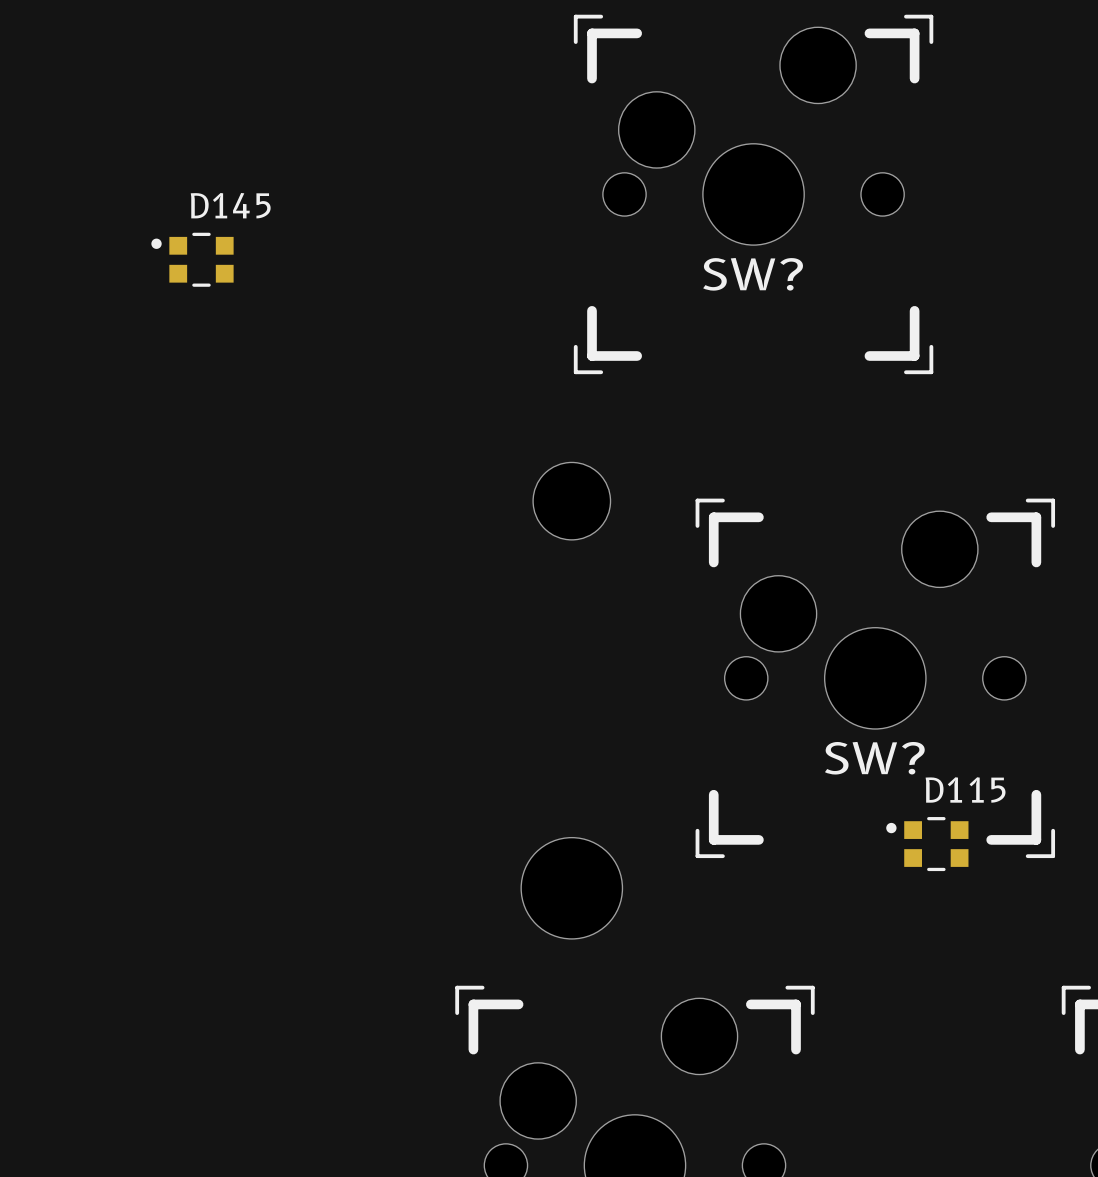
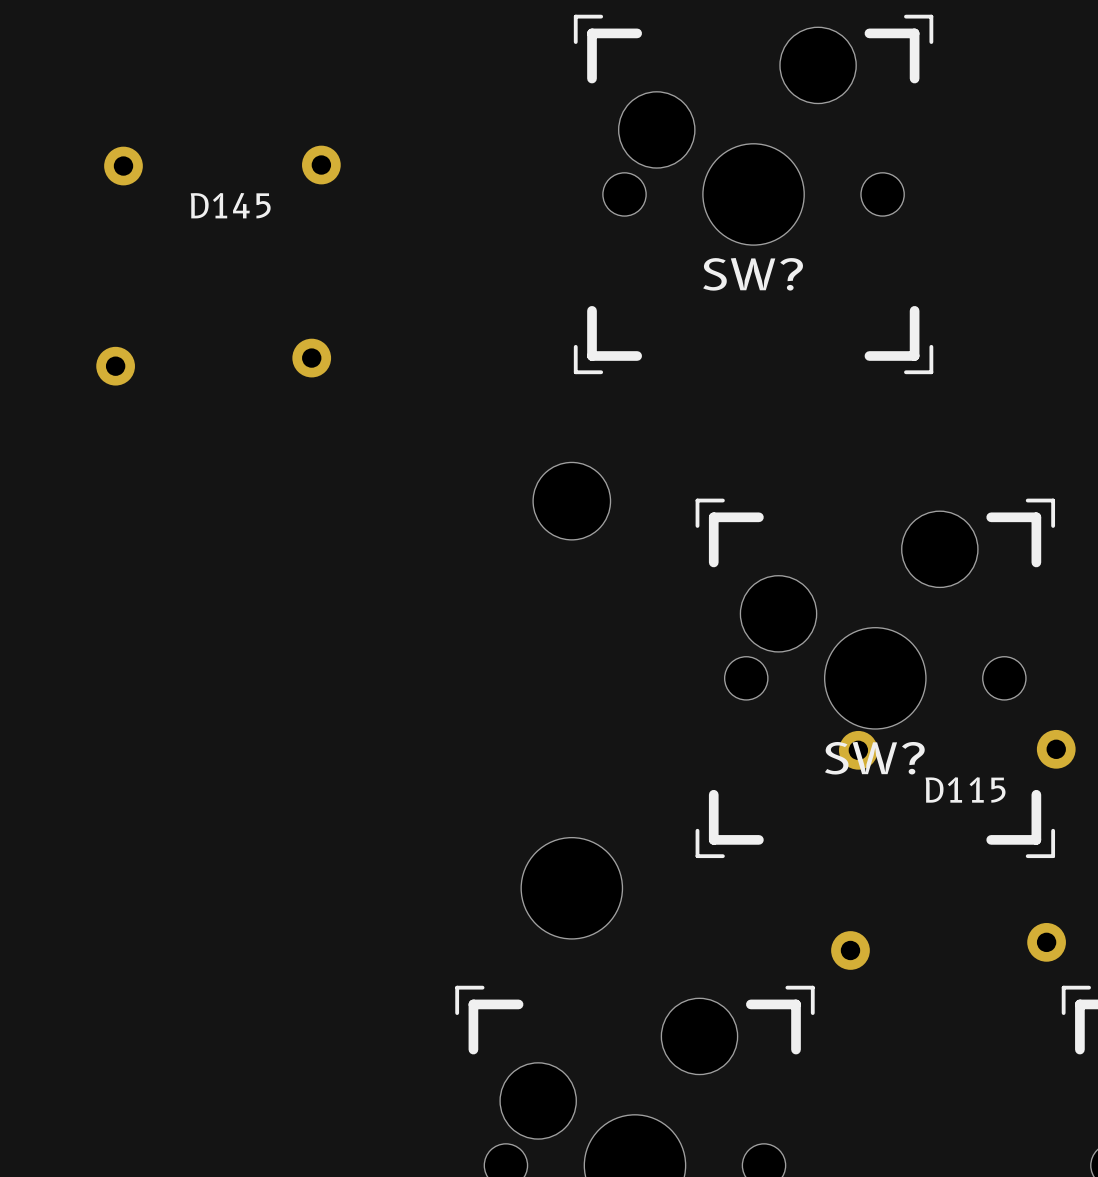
D145 footprint: [151, 232, 234, 287] -> [96, 145, 341, 386]
D115 footprint: [886, 817, 969, 872] -> [831, 729, 1076, 970]

